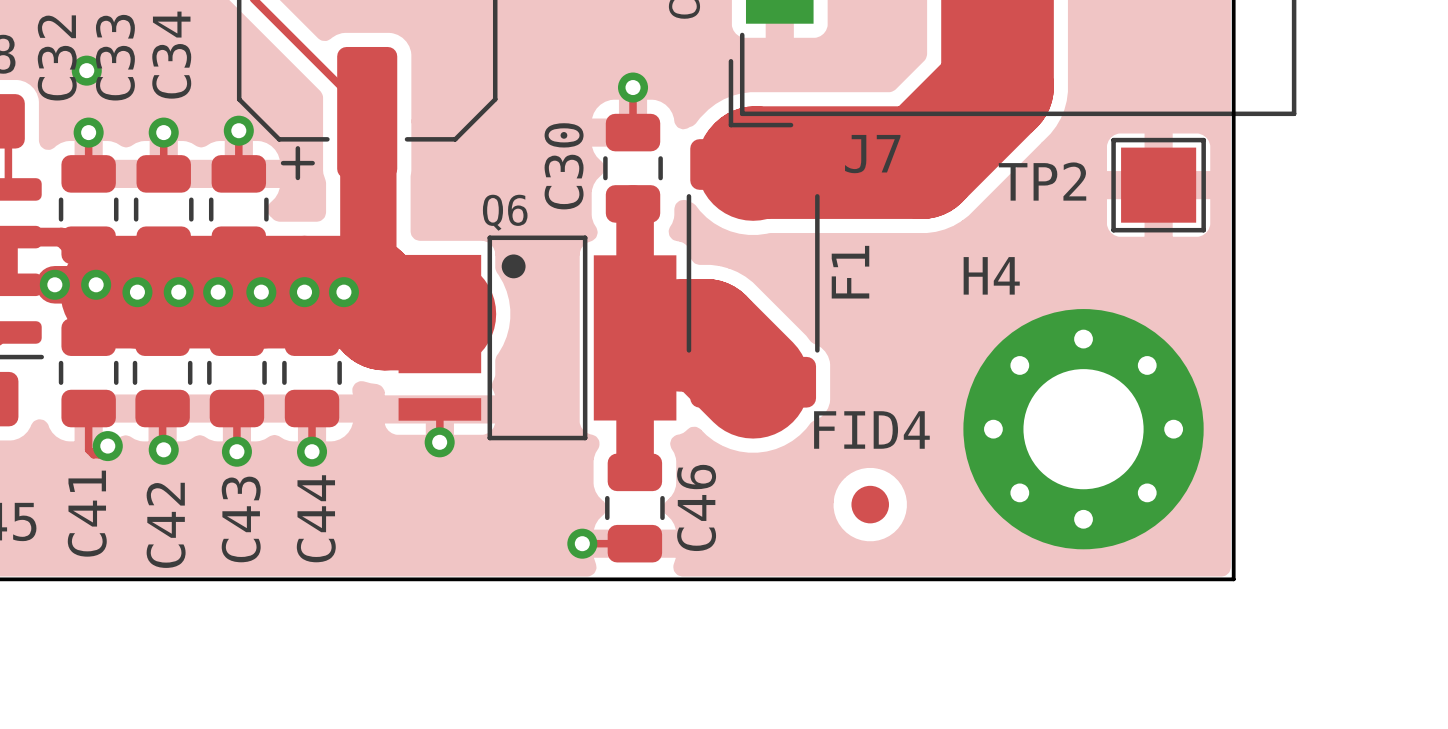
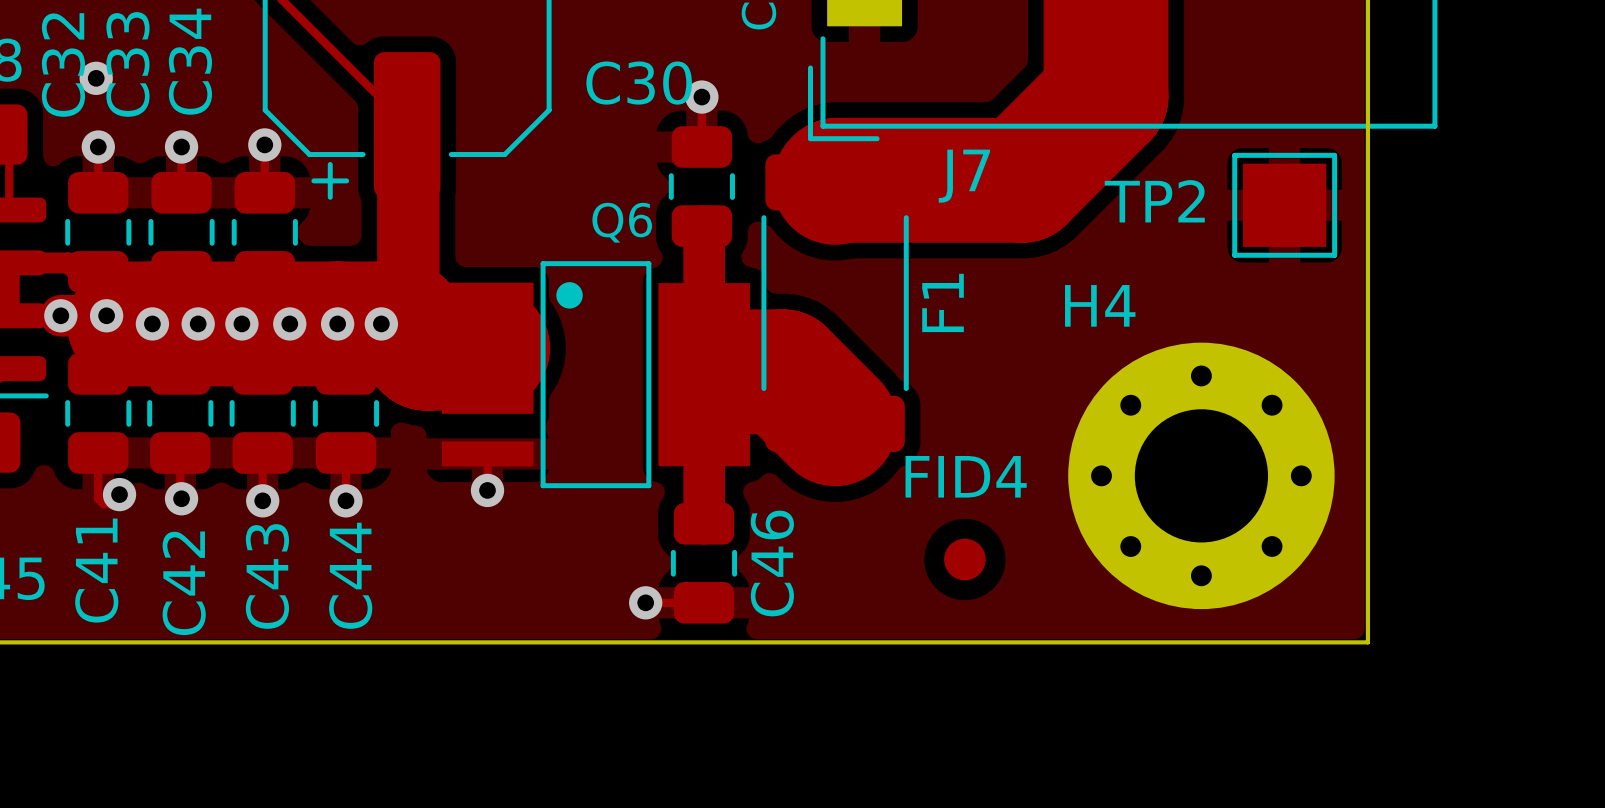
C30 name rotation: 0° (564, 166) -> 90° clockwise (639, 83)
Q6 name position: Q6 (505, 212) -> Q6 (622, 222)

